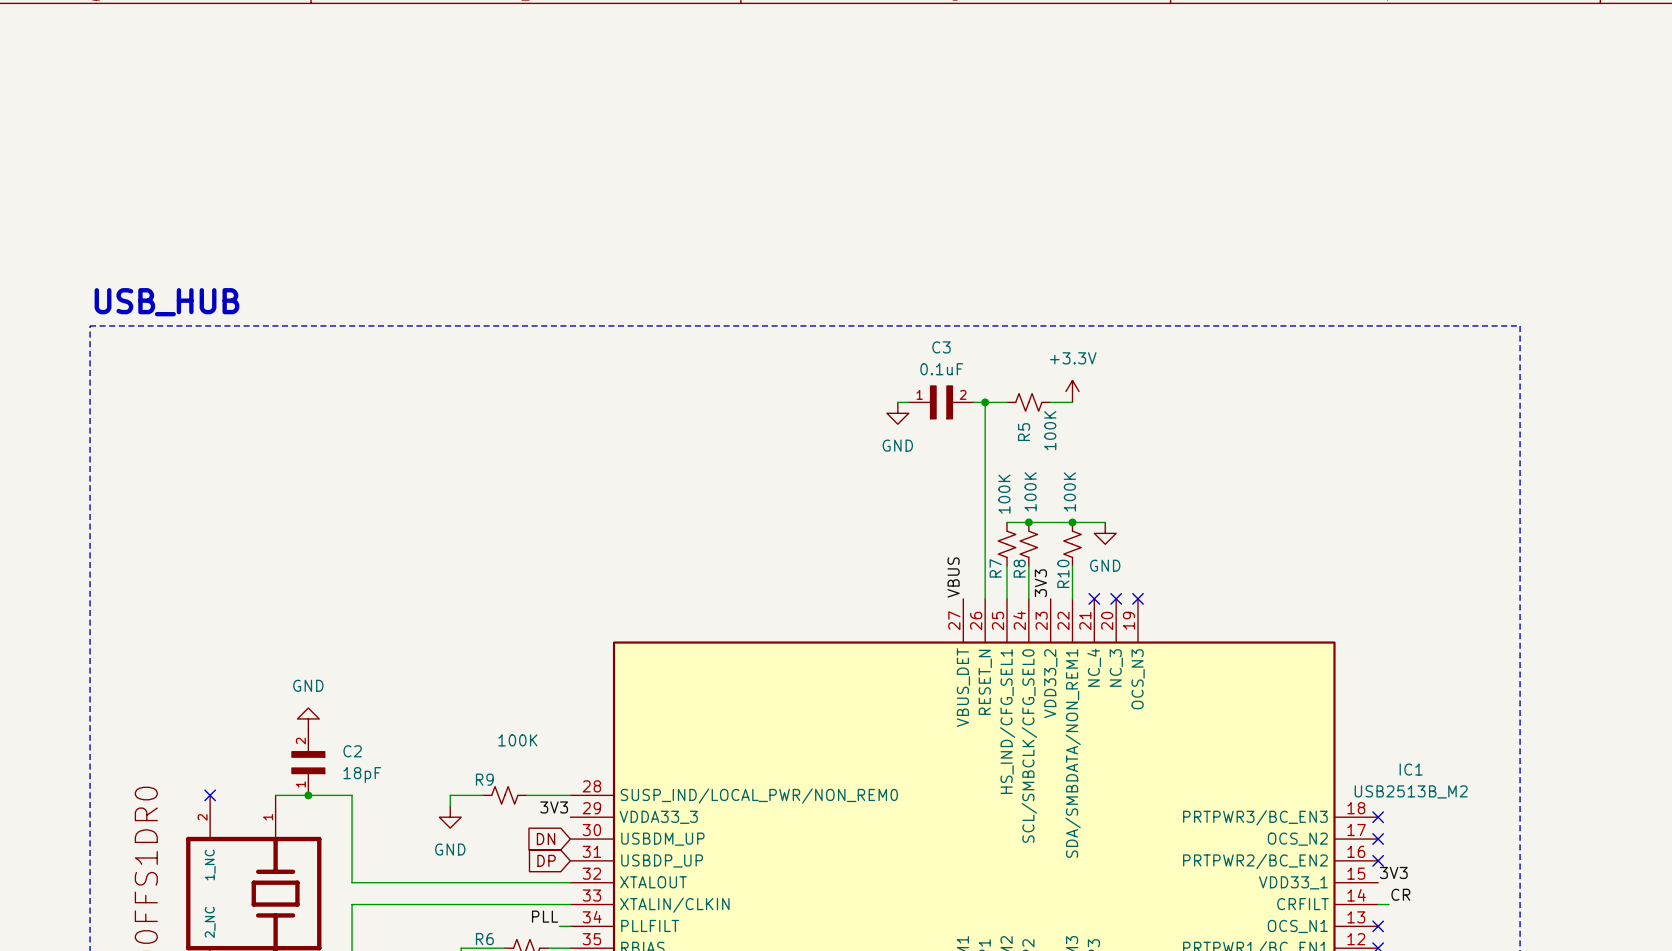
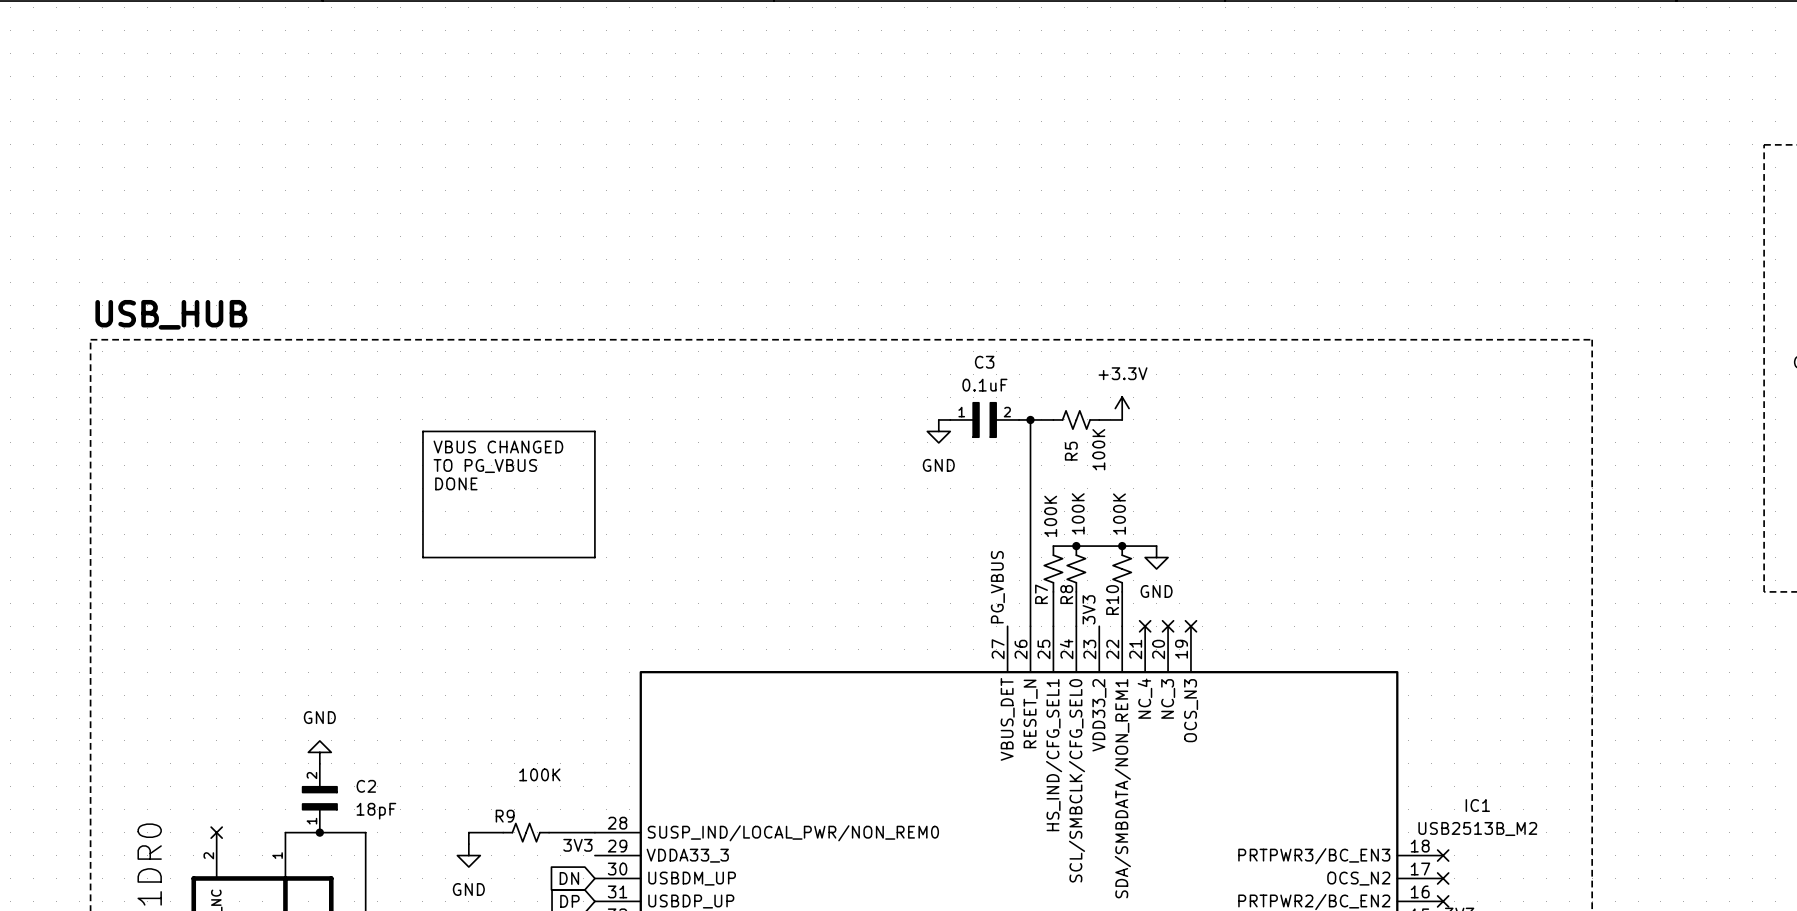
line: none -> (422, 431) (594, 431) (594, 557) (422, 557) (422, 431)
text: none -> VBUS CHANGED (498, 447)
text: none -> TO PG_VBUS (485, 466)
text: none -> DONE (456, 483)
label: VBUS (953, 577) -> PG_VBUS (997, 587)

